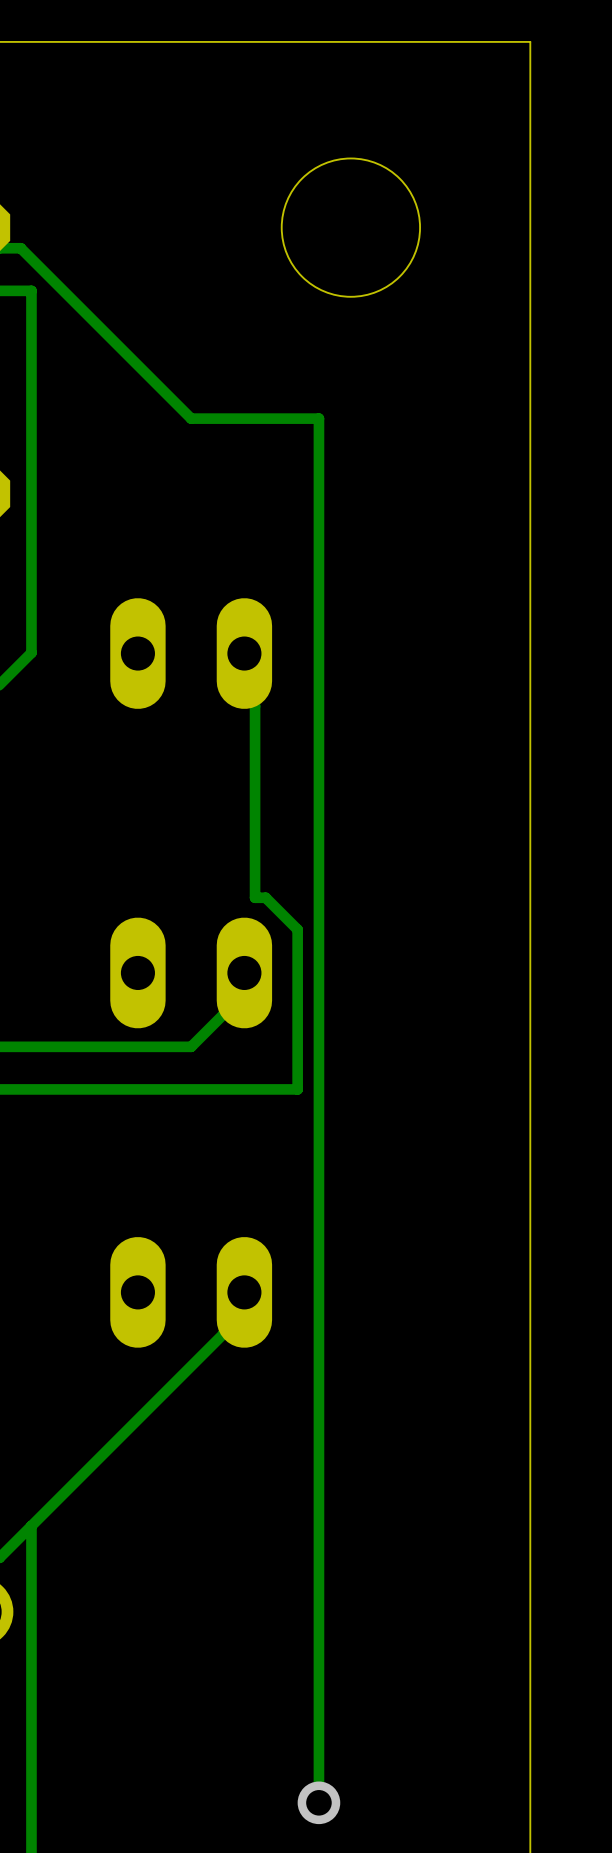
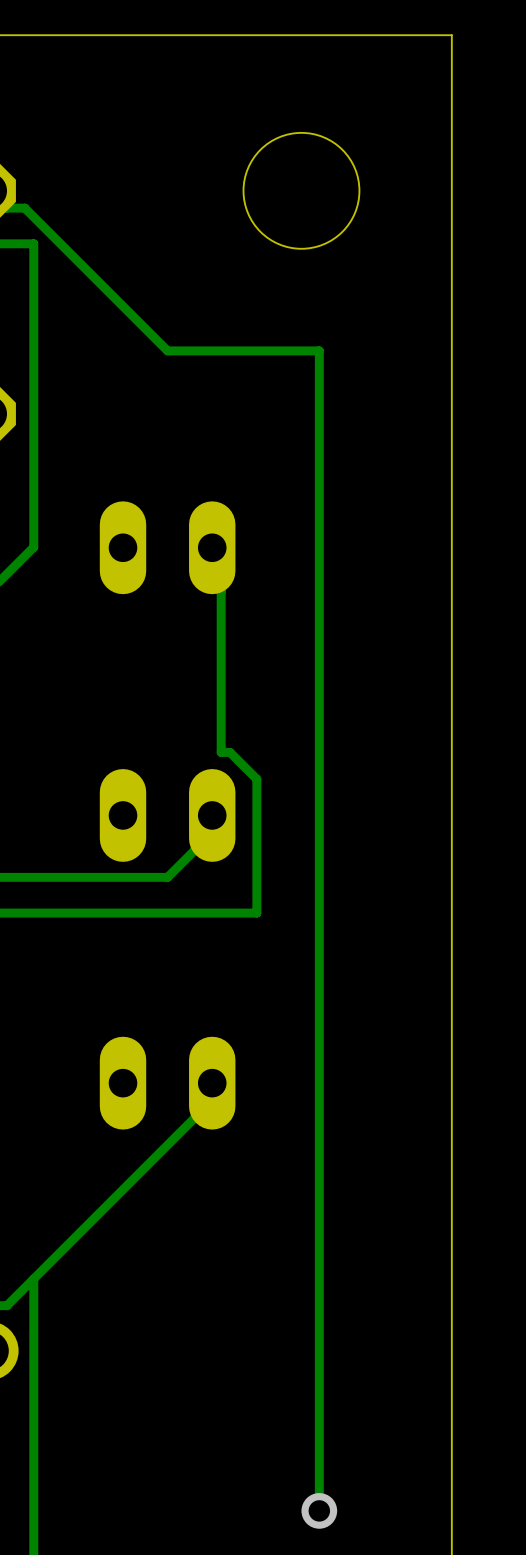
track: (318, 418) (318, 1802) -> (274, 350) (319, 350) (319, 1510)
via position: (318, 1802) -> (319, 1510)

